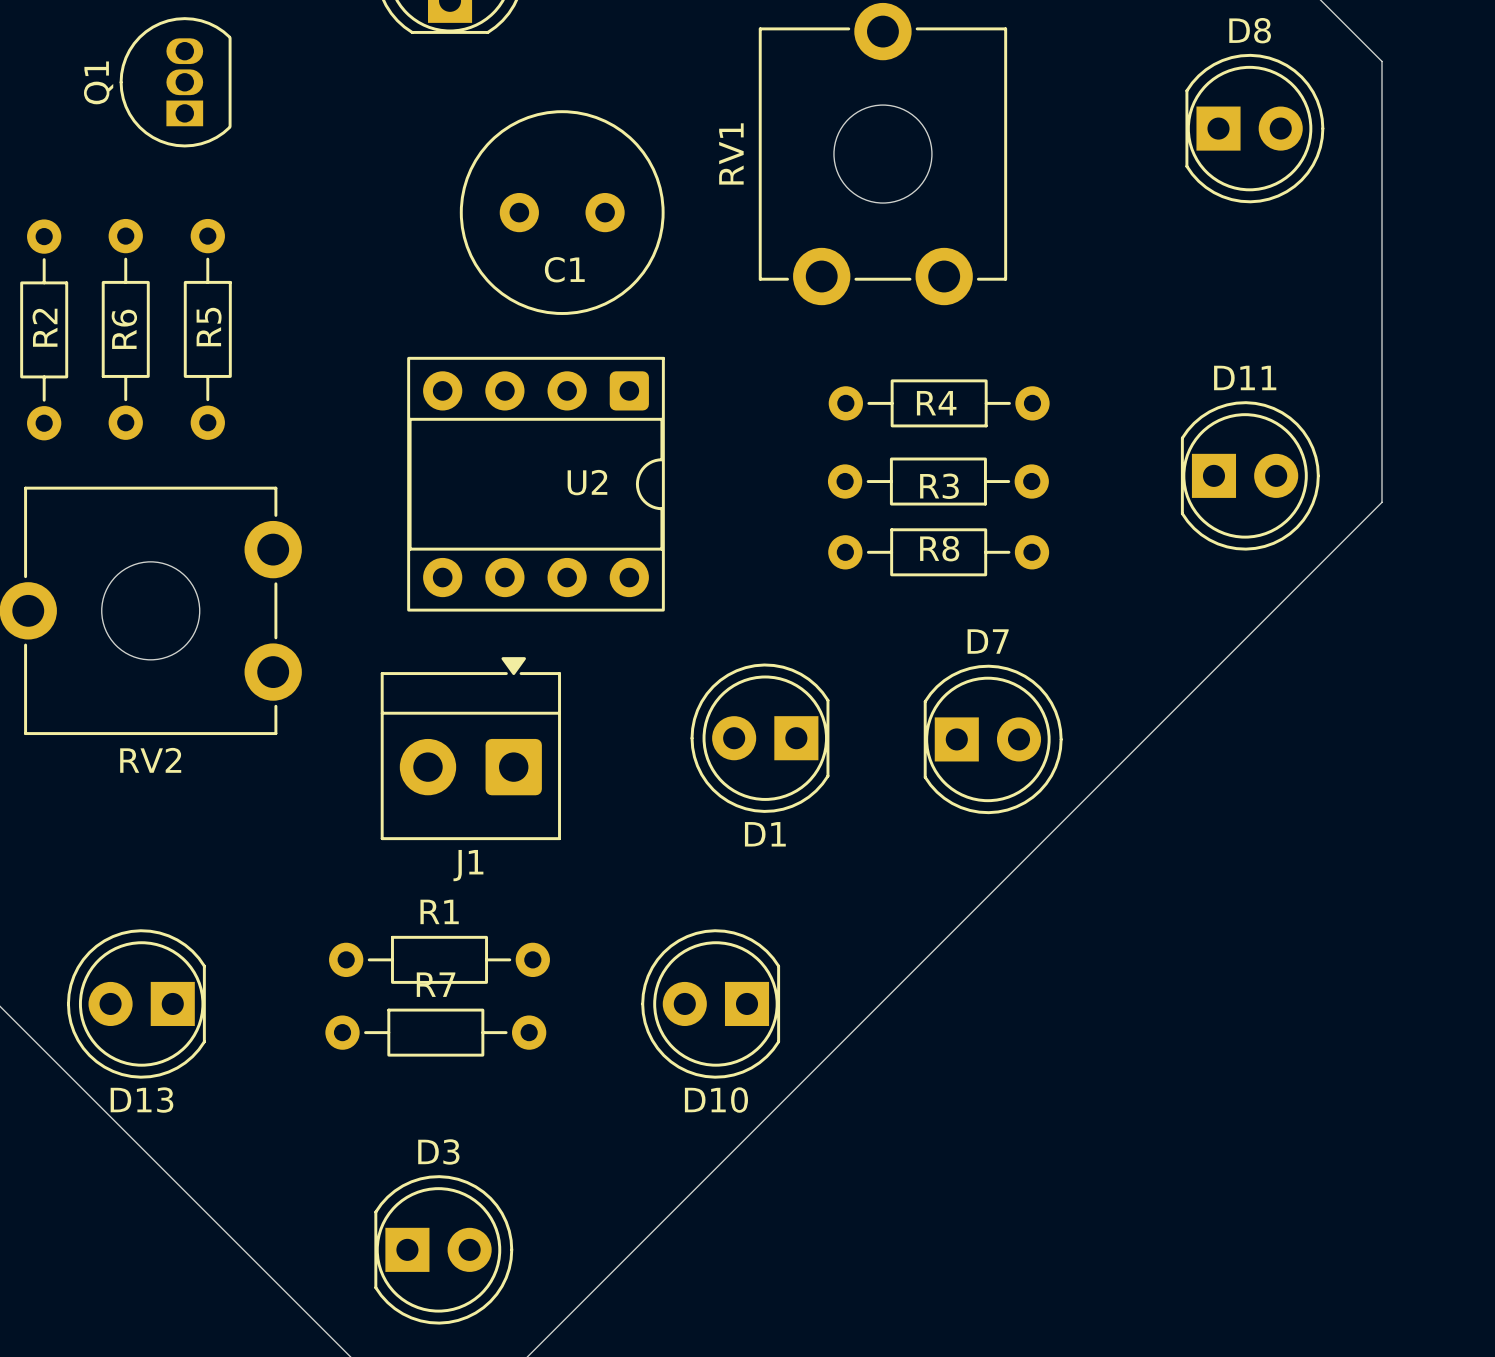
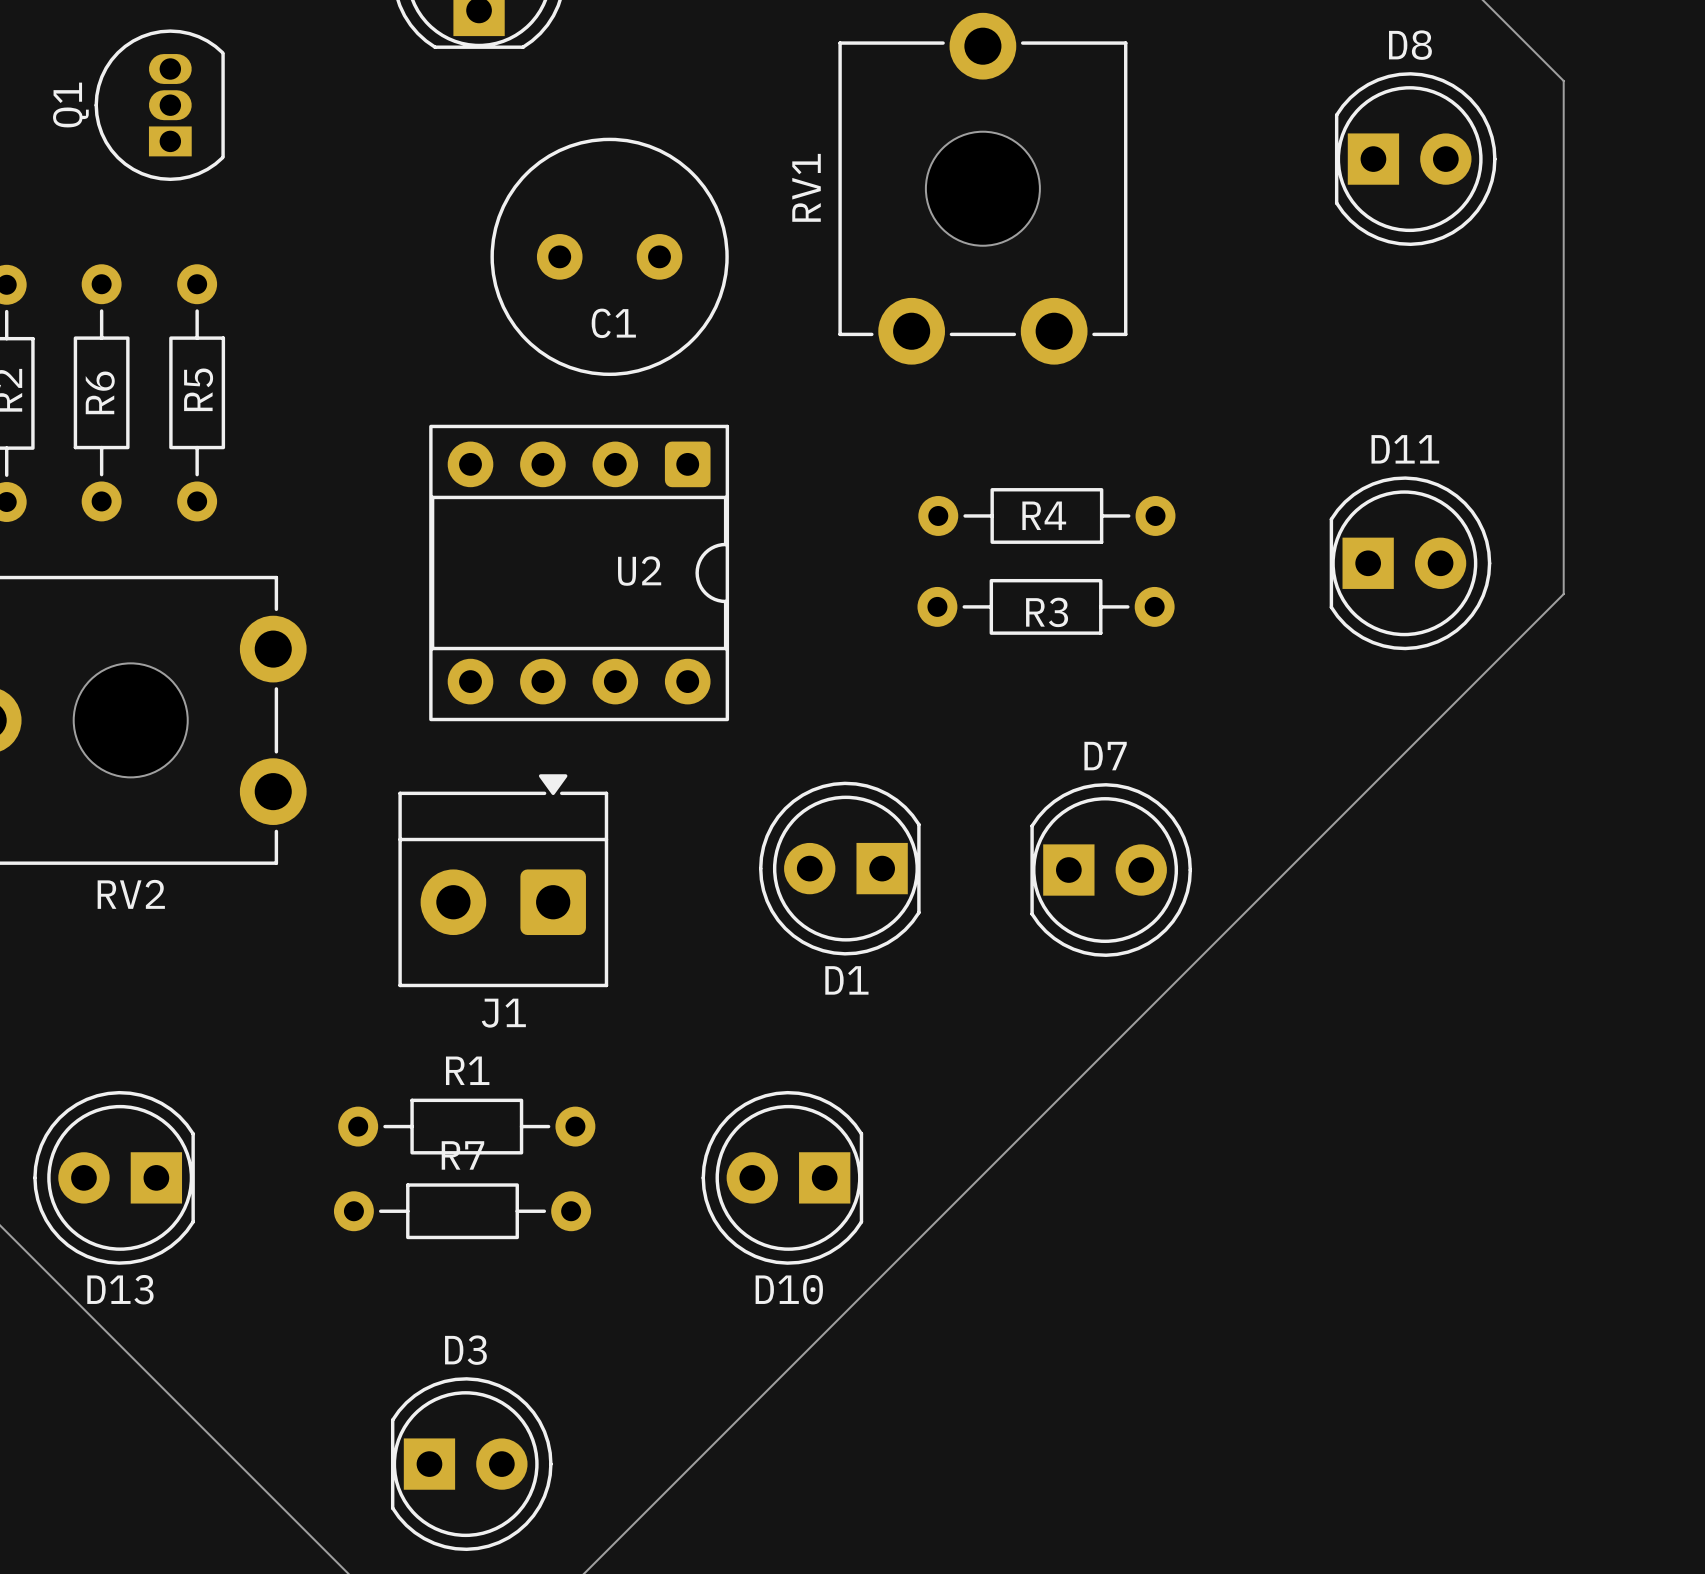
R4 position: (939, 403) -> (1046, 515)
R3 position: (938, 481) -> (1046, 606)
R8: (938, 552) -> none

